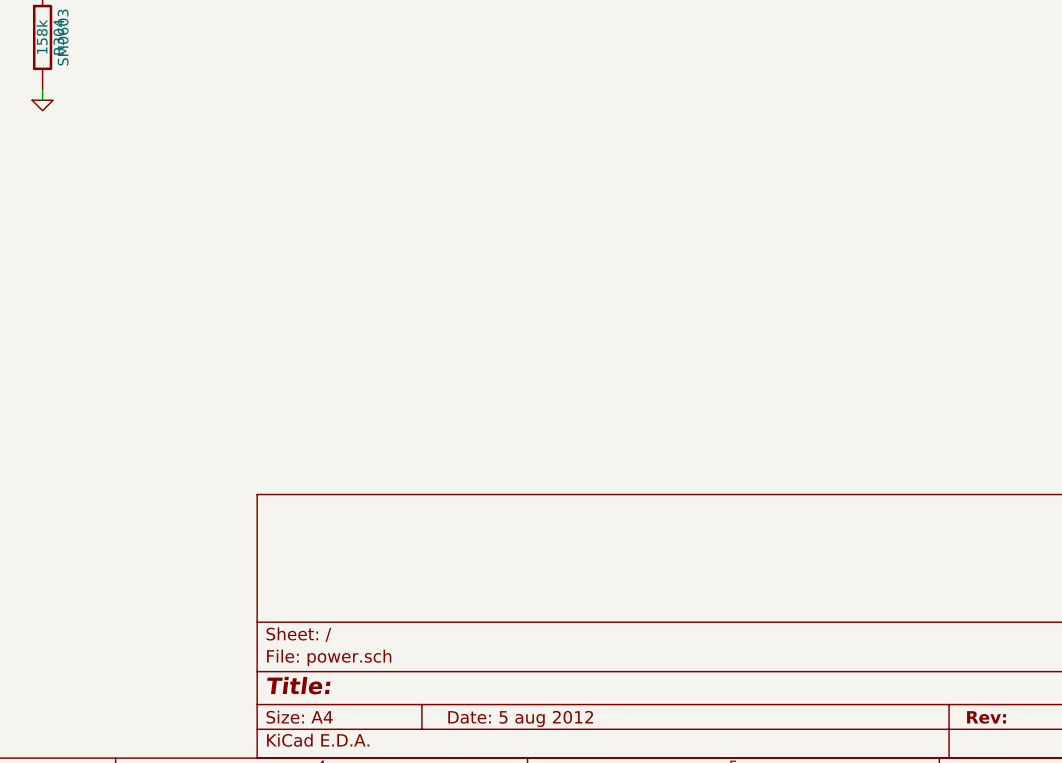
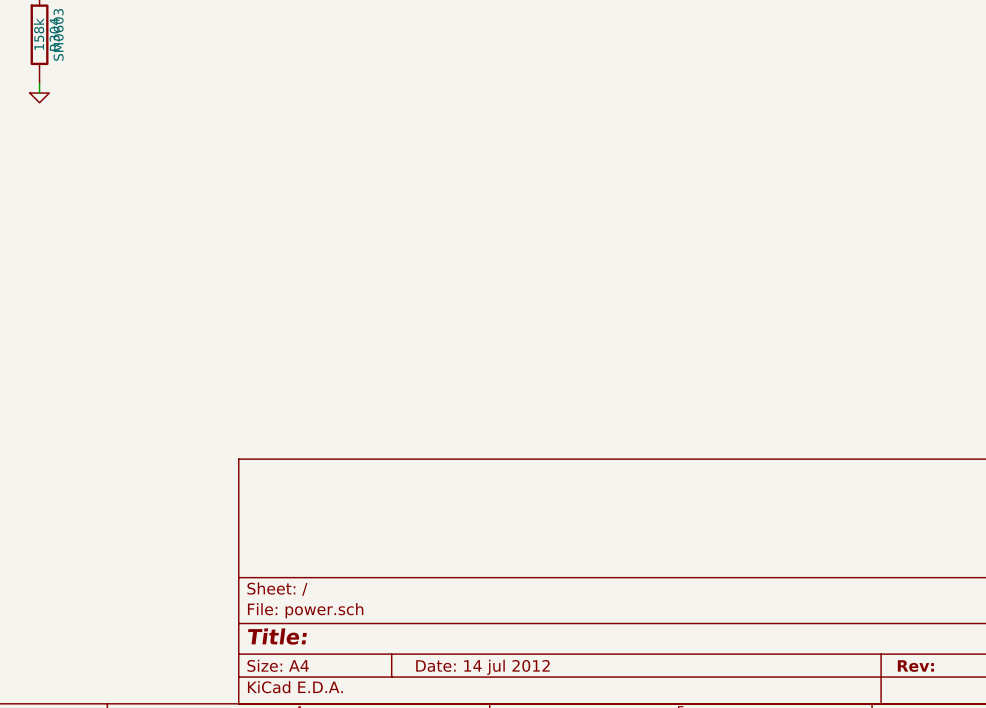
title block: Date: 5 aug 2012 (520, 718) -> Date: 14 jul 2012 (482, 667)

